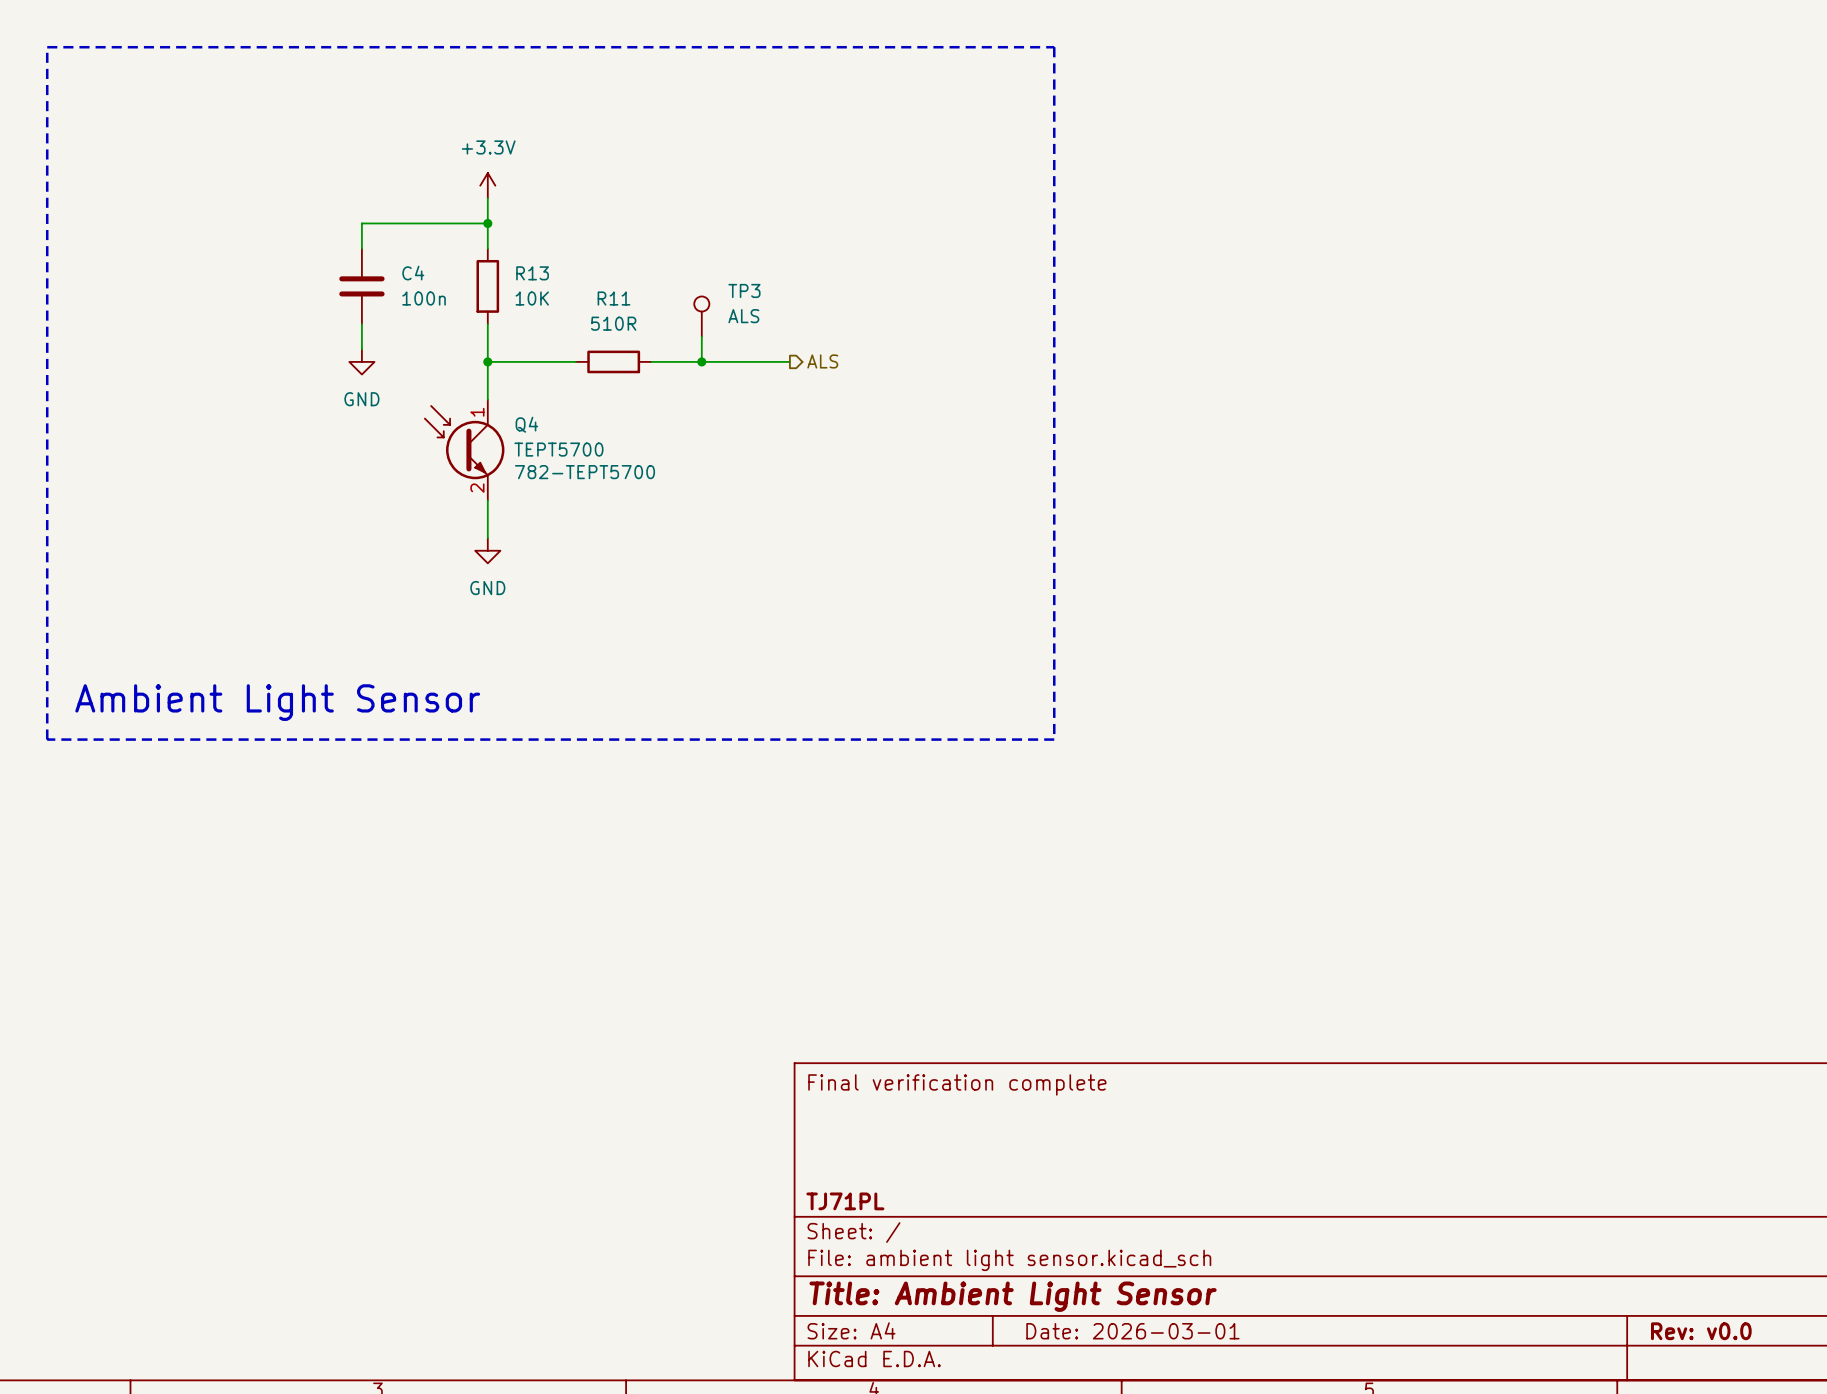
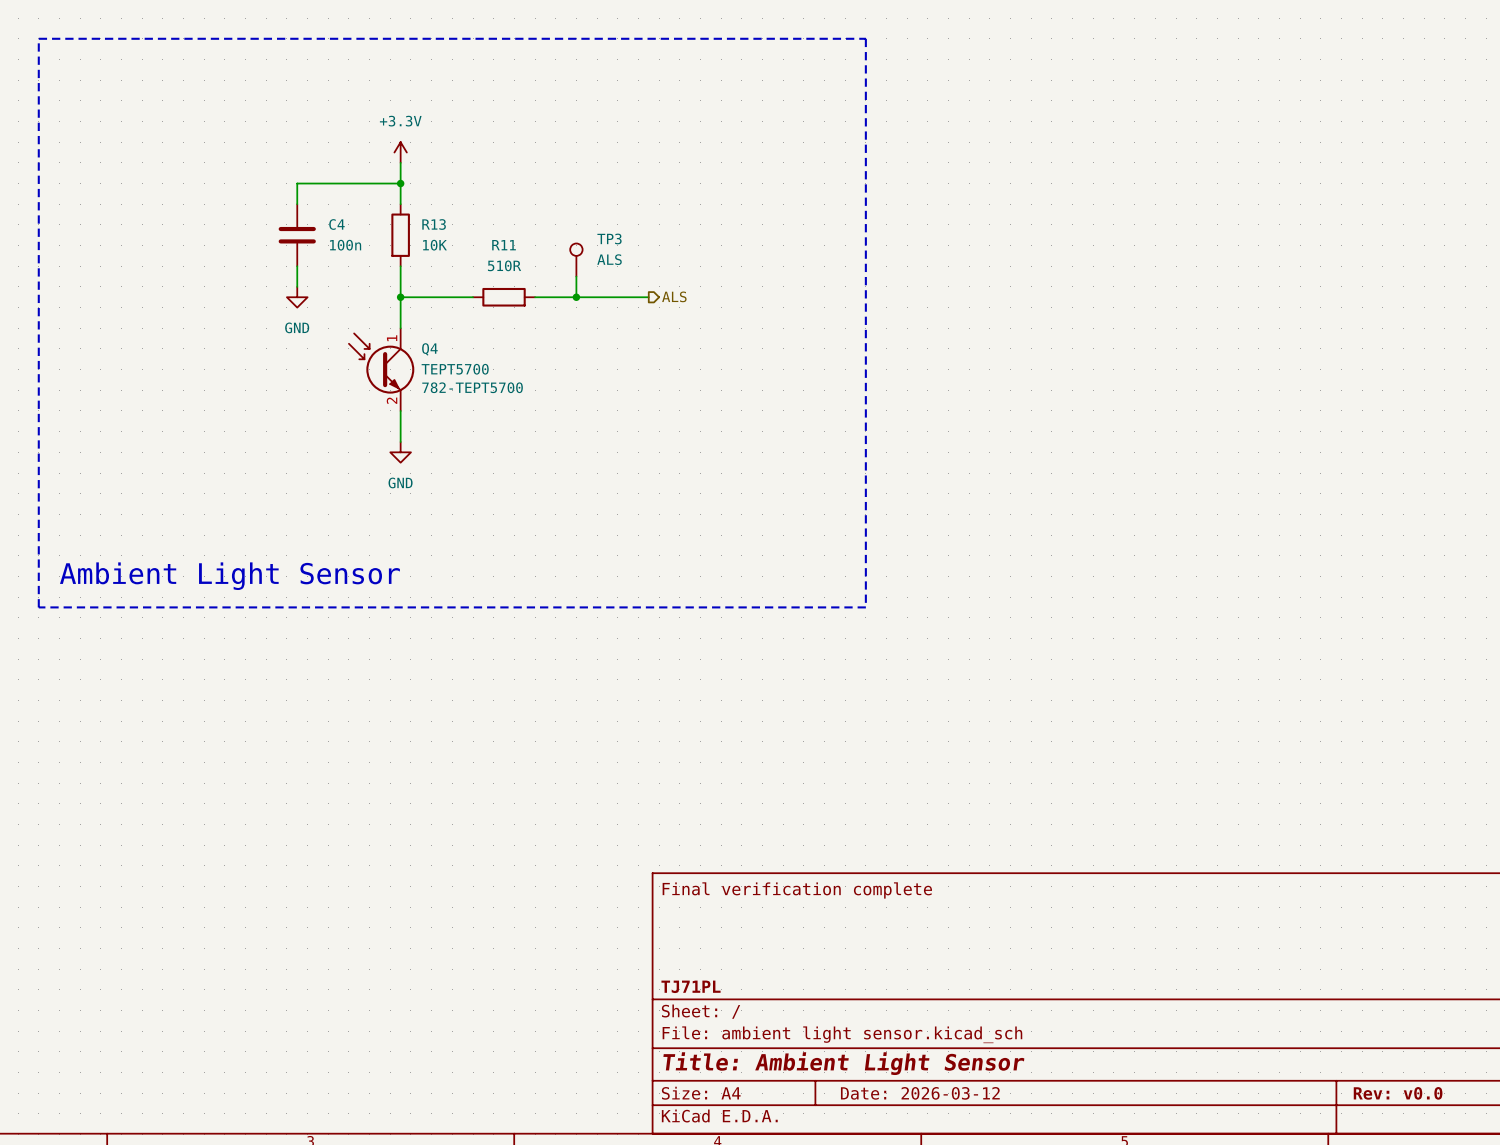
title block: Date: 2026-03-01 (1132, 1331) -> Date: 2026-03-12 (920, 1093)

